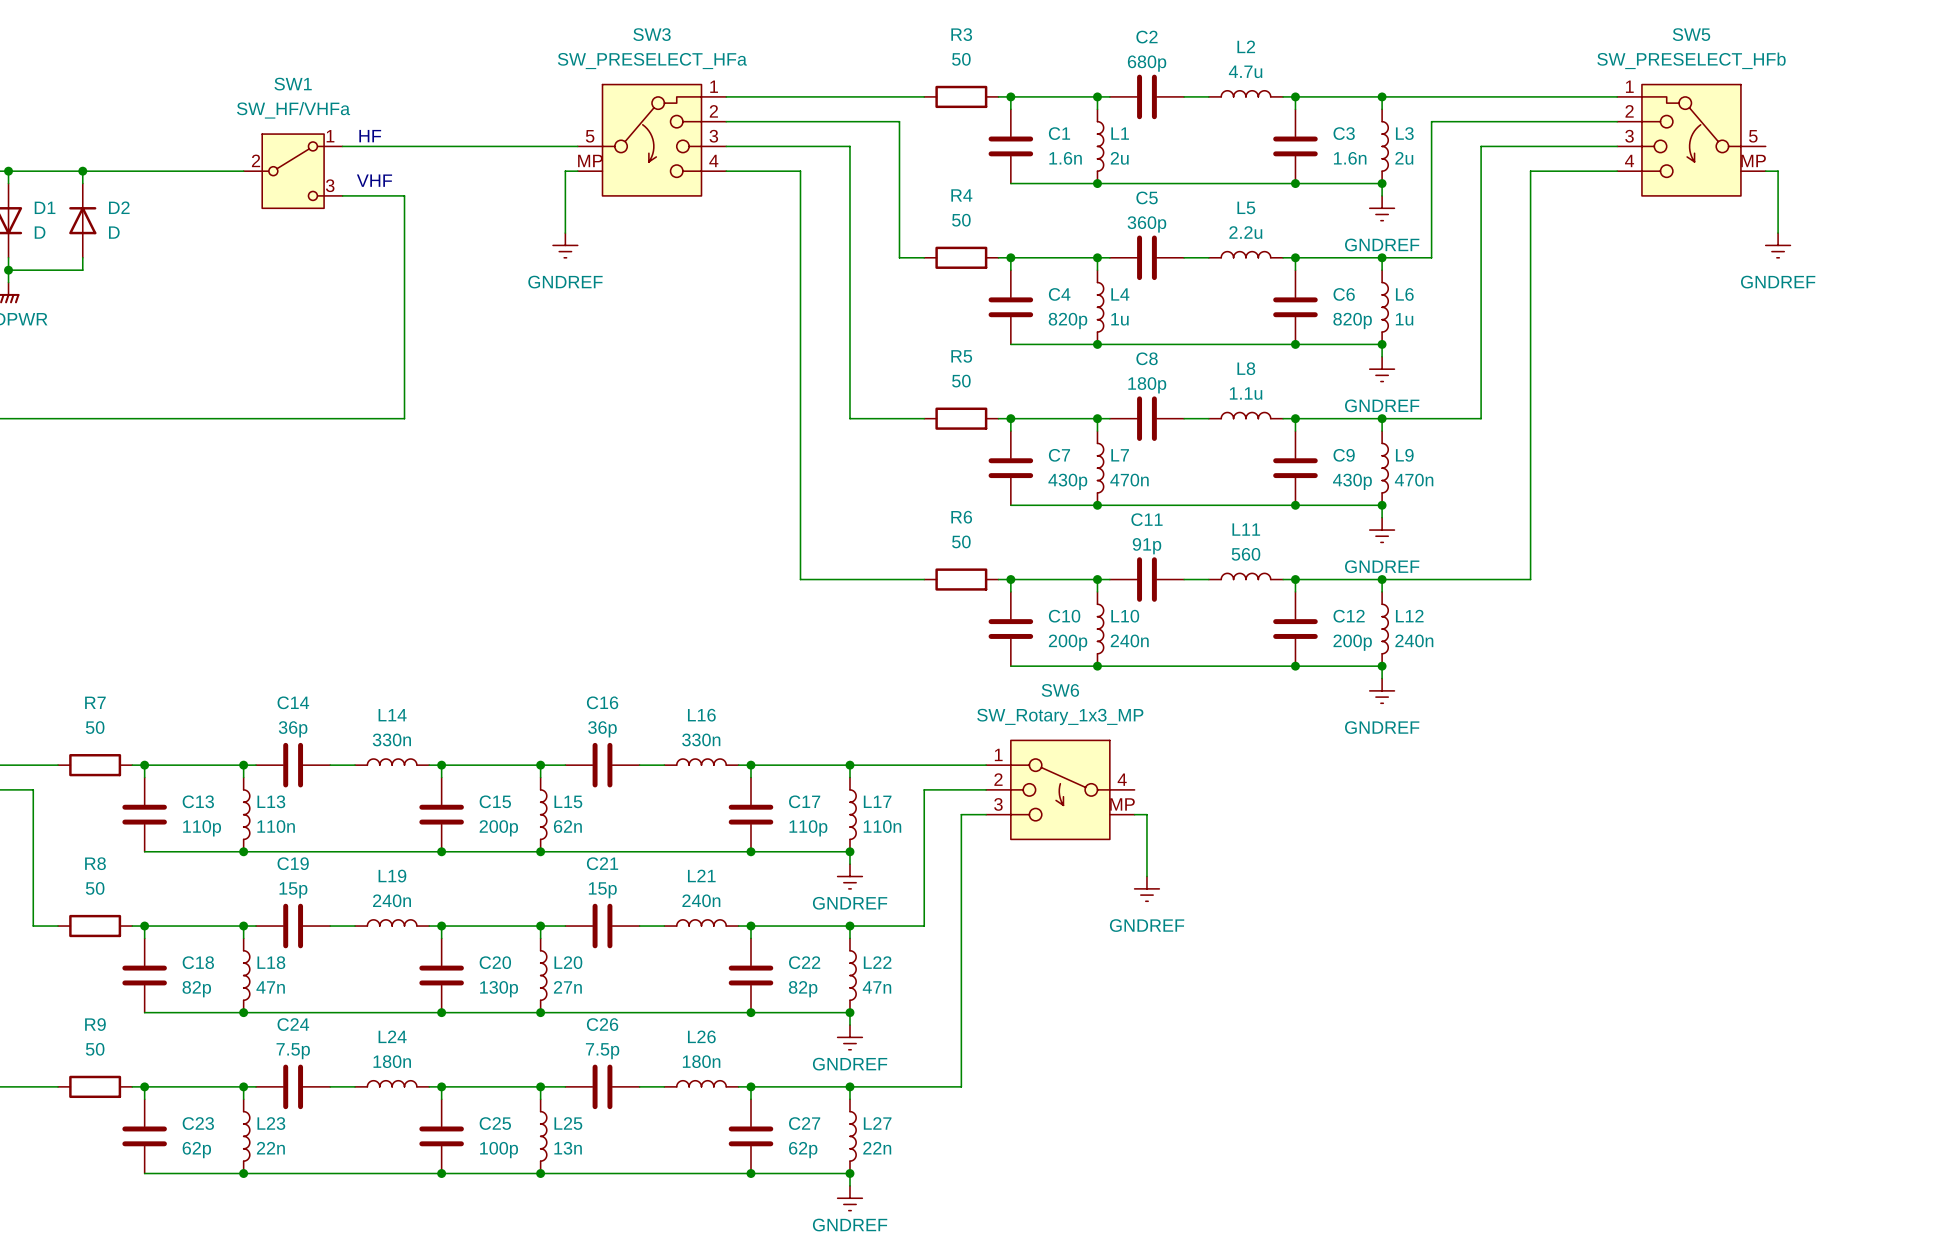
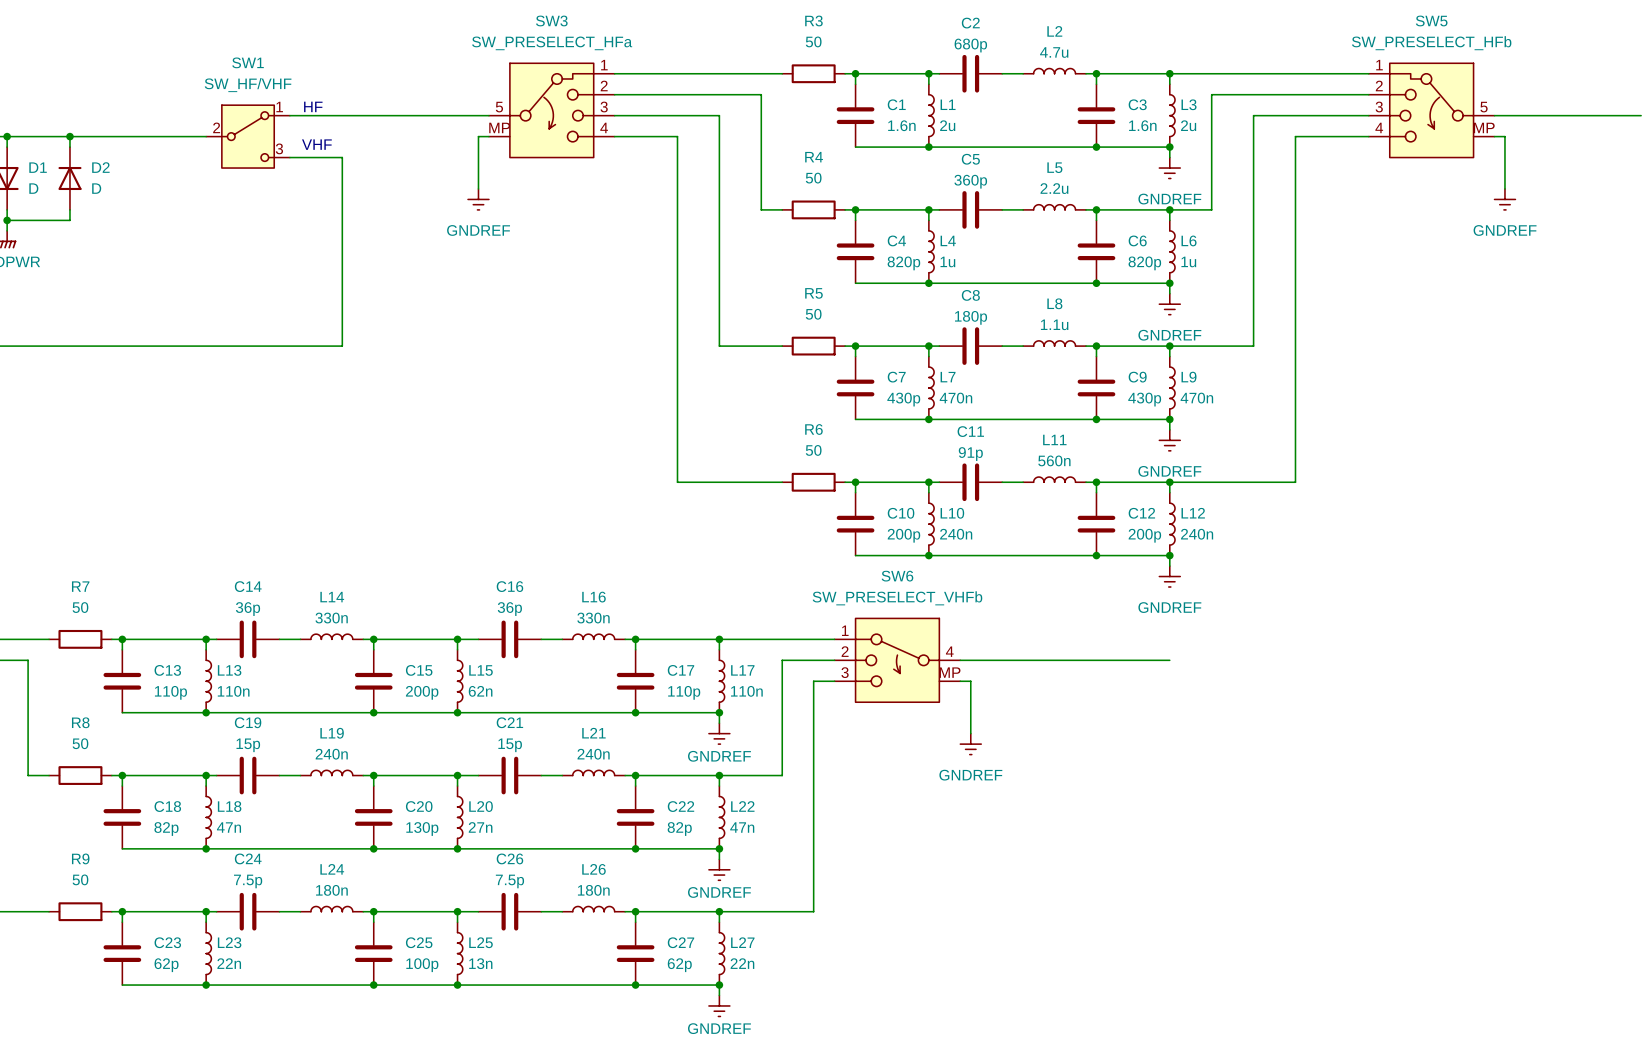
SW1 value: SW_HF/VHFa (293, 110) -> SW_HF/VHF (248, 85)
wire: none -> (1494, 115) (1641, 115)
L11 value: 560 (1245, 554) -> 560n (1054, 460)
SW6 value: SW_Rotary_1x3_MP (1060, 716) -> SW_PRESELECT_VHFb (897, 598)
wire: none -> (960, 660) (1169, 660)

